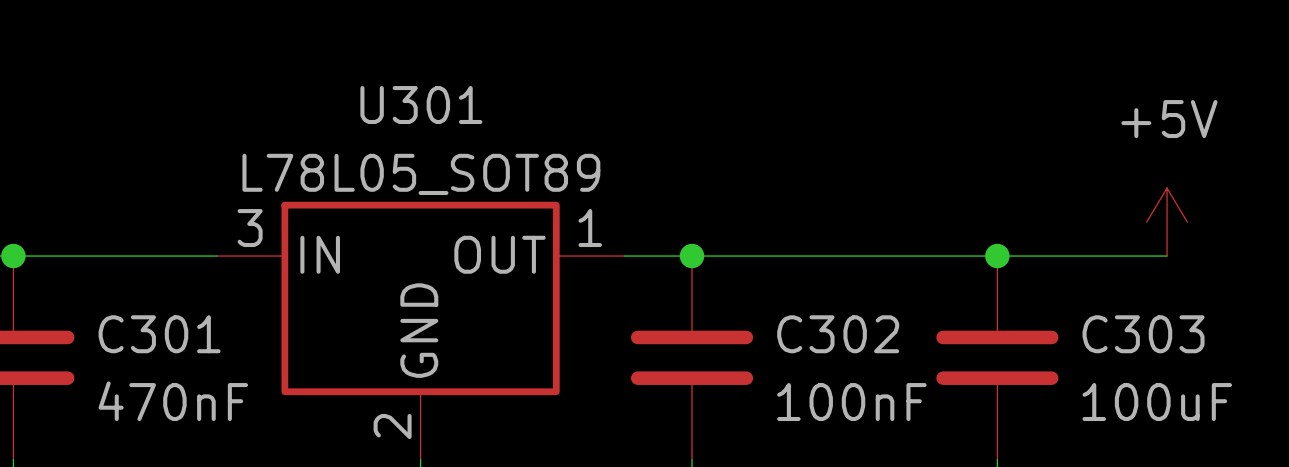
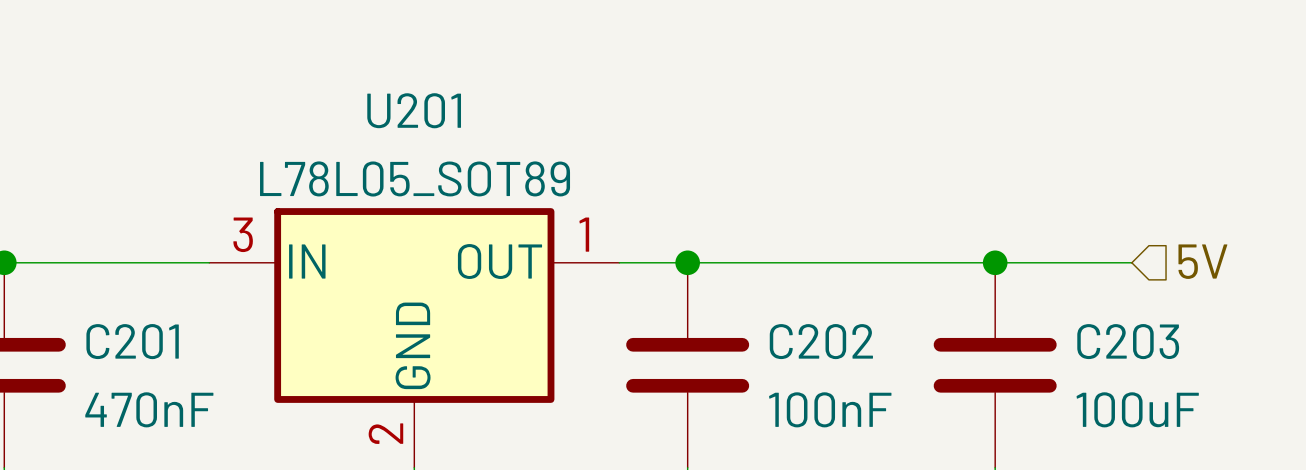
U301 name: U301 (421, 105) -> U201 (414, 110)
power symbol: +5V (1167, 222) -> none
hierarchical label: none -> 5V (1202, 261)
wire: (1133, 256) (1167, 256) -> none
C301 name: C301 (159, 334) -> C201 (132, 341)
C302 name: C302 (838, 334) -> C202 (821, 341)
C303 name: C303 (1143, 334) -> C203 (1128, 341)

